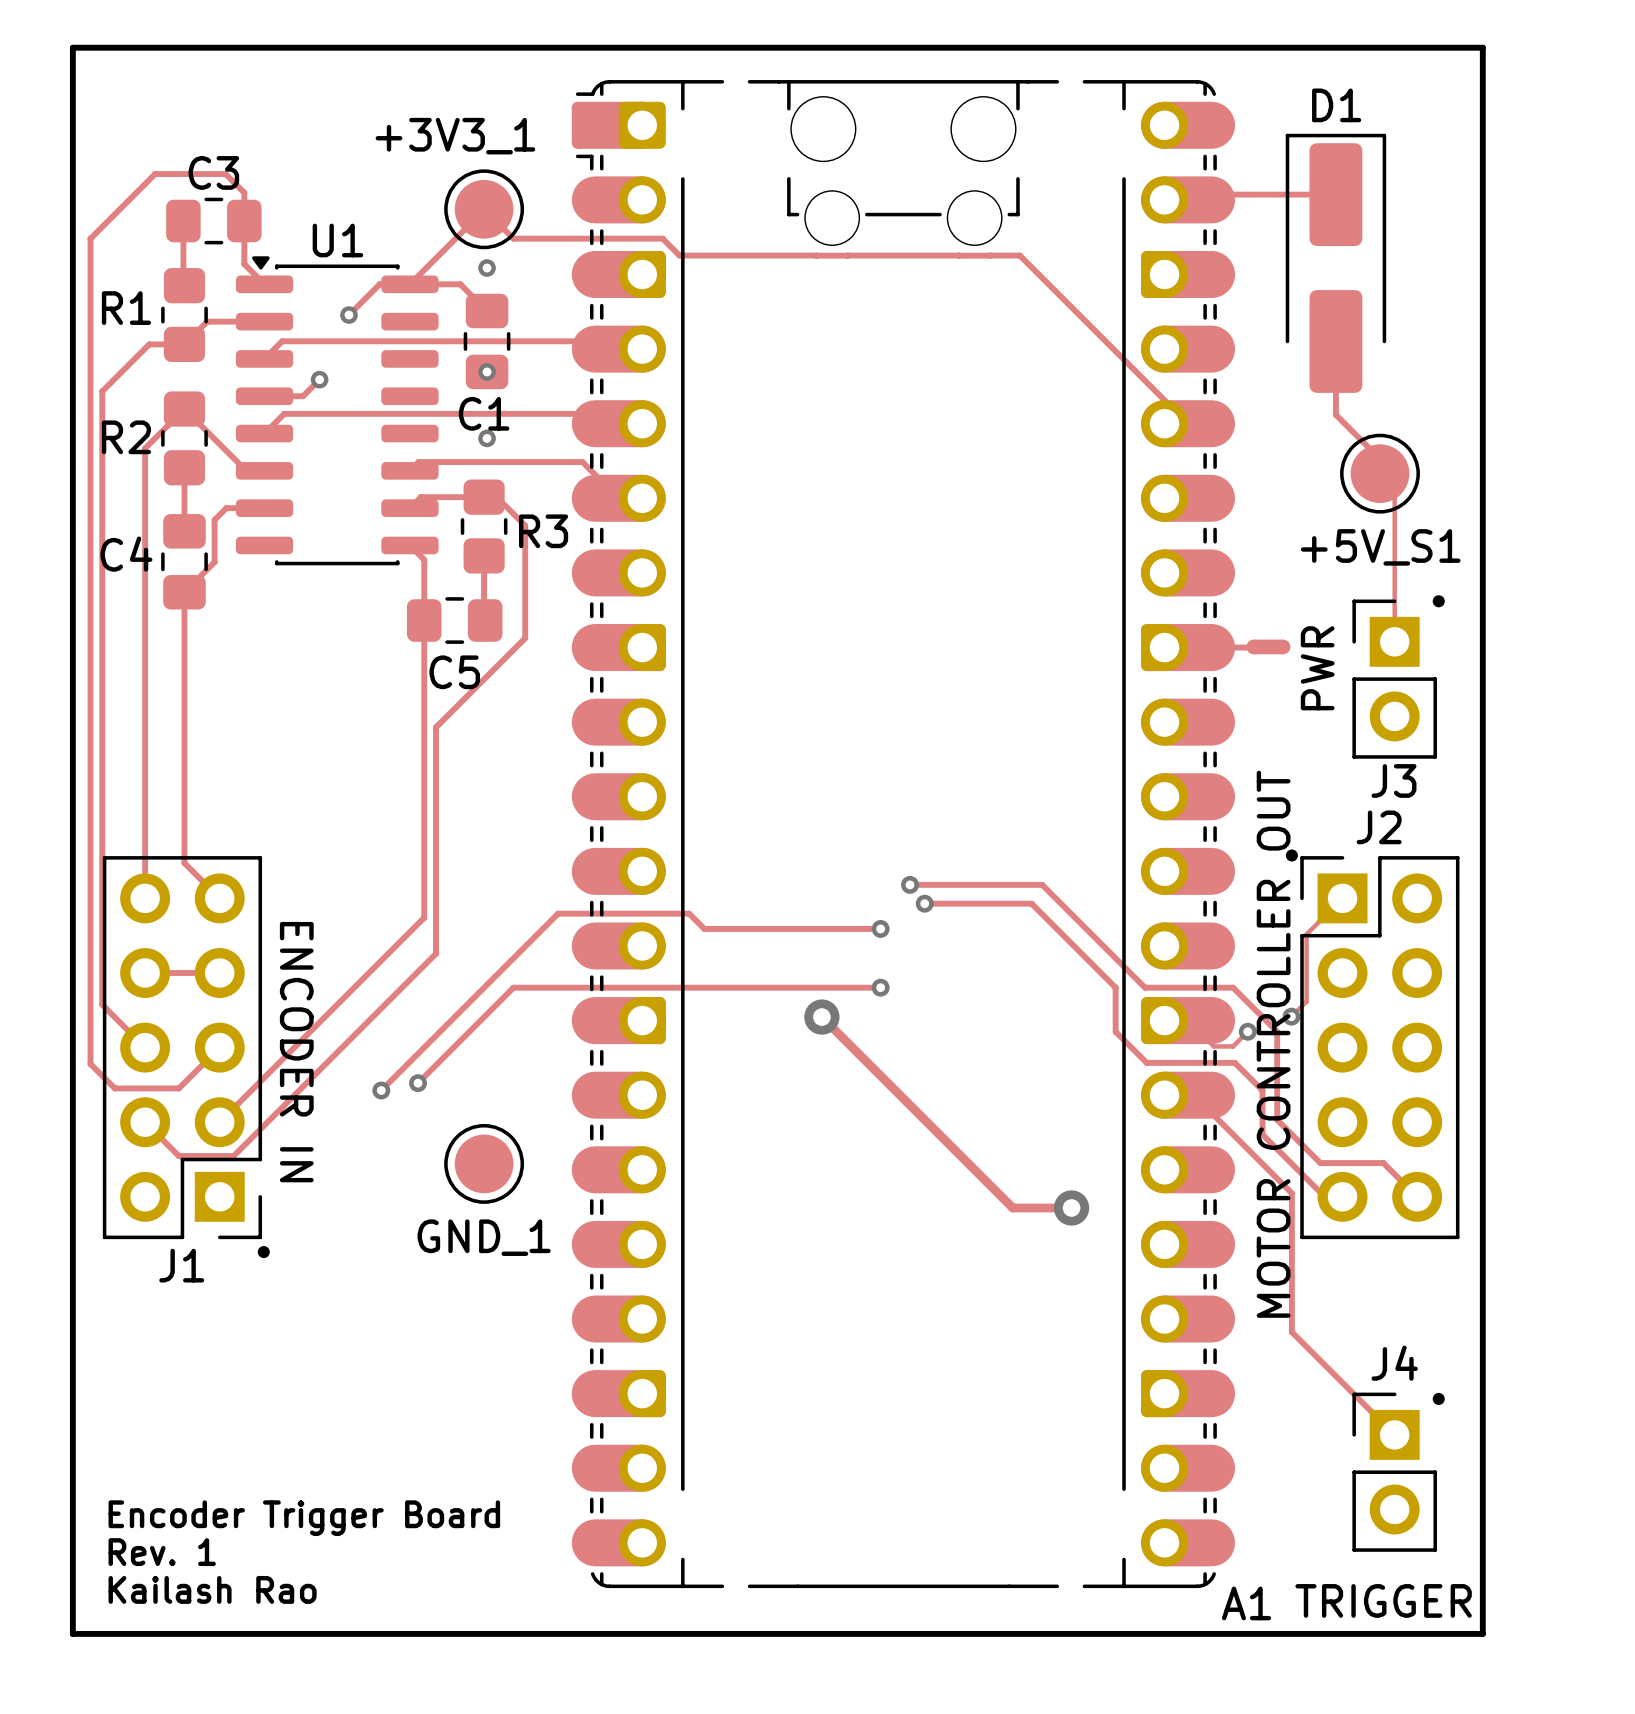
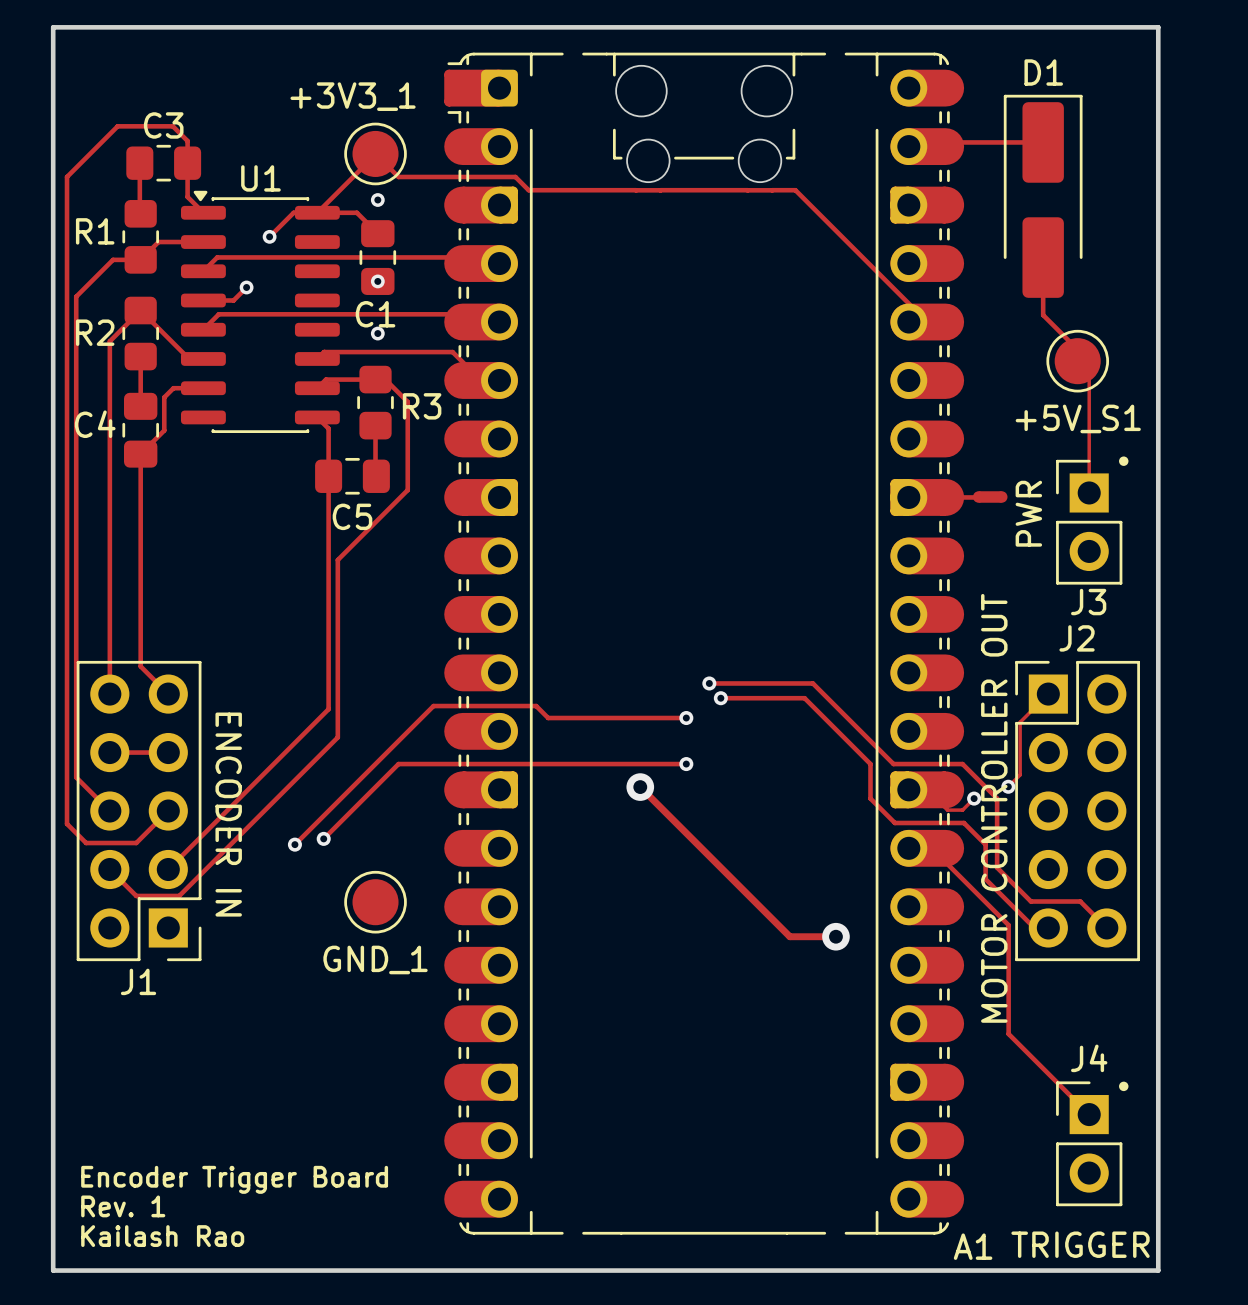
drawing: [1285, 849, 1298, 862] -> none
drawing: [257, 1246, 270, 1259] -> none

